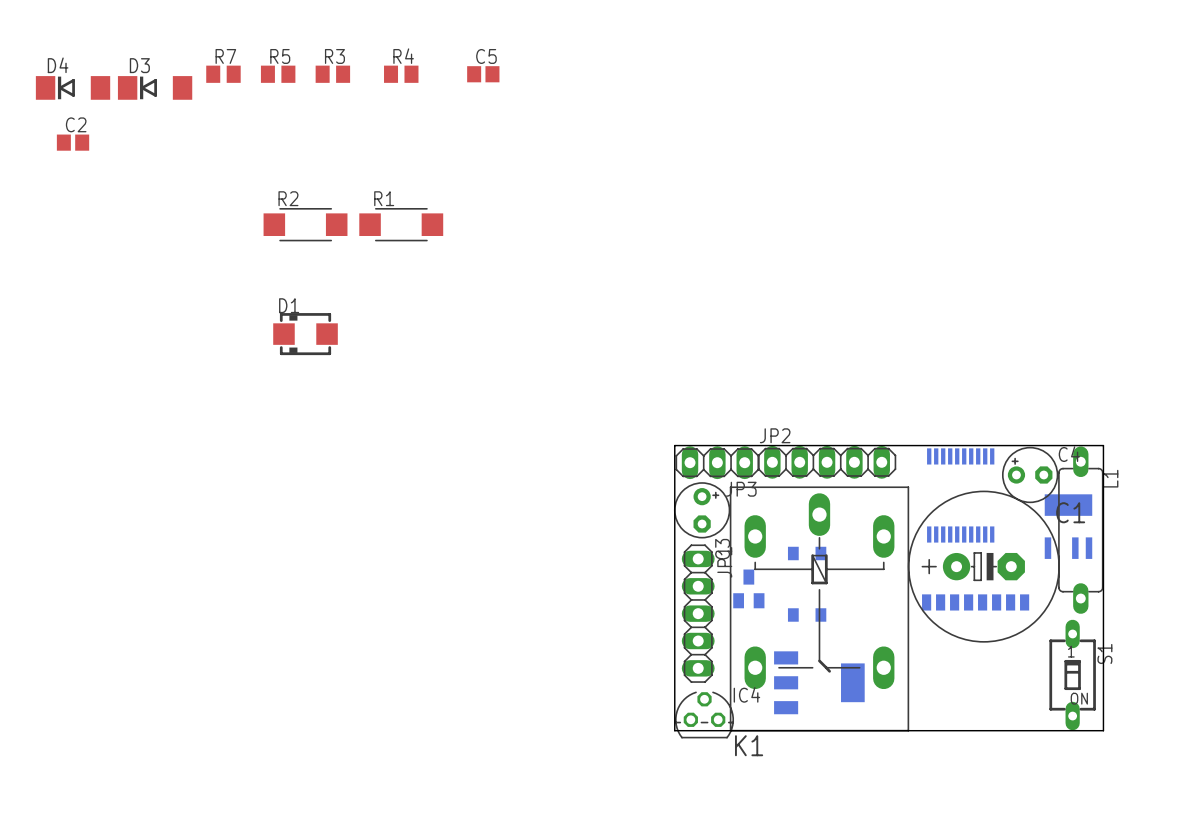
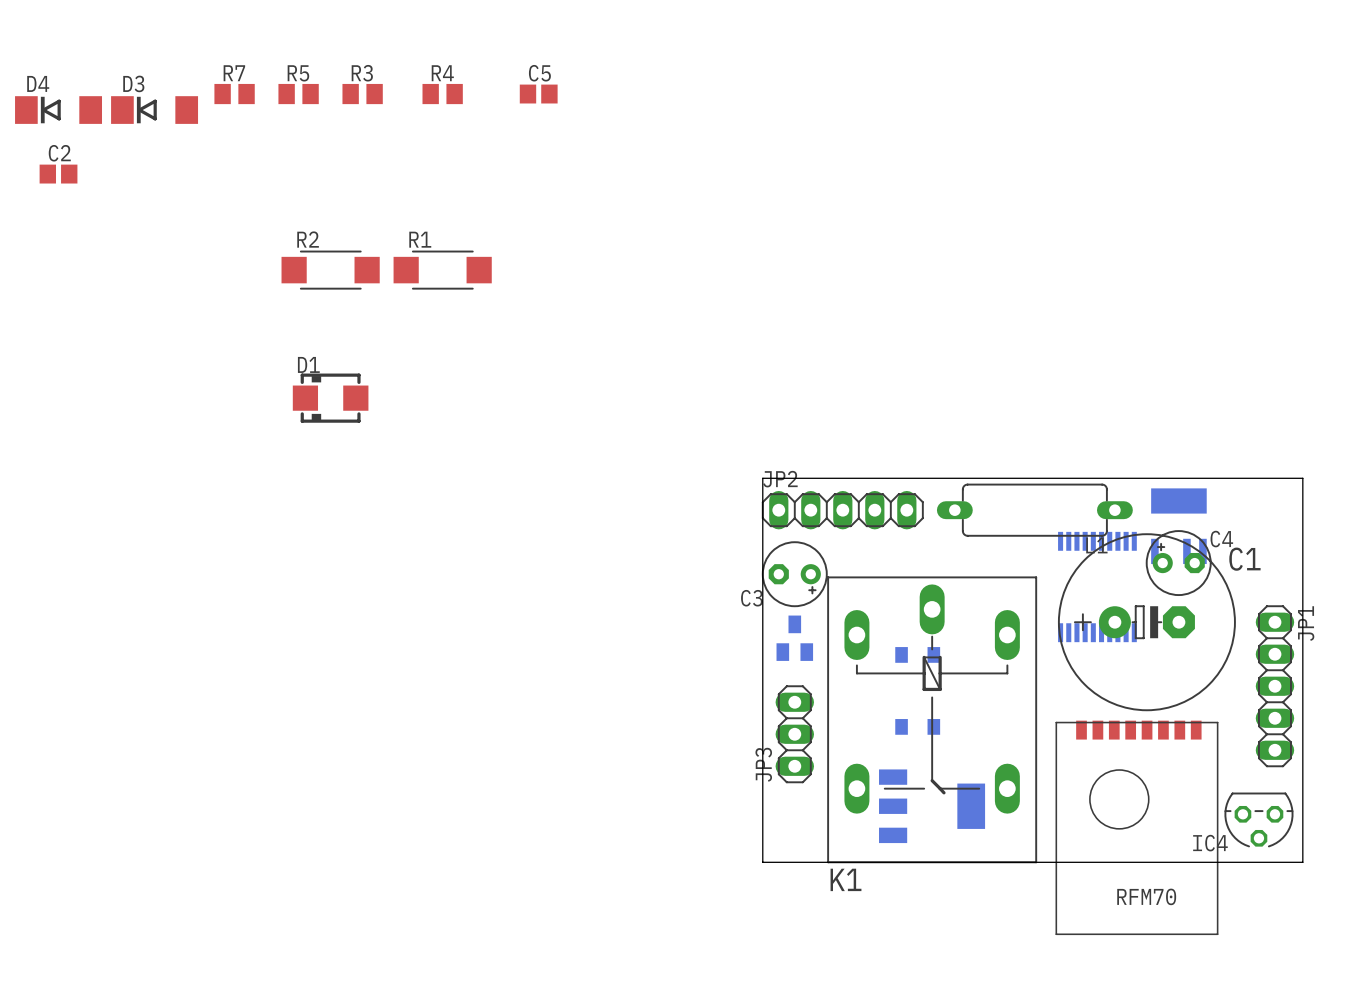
board edge: (674, 445) (1103, 445) (1103, 730) -> (762, 528) (762, 478) (1302, 478) (1302, 862) (1264, 862)
JP3 rotation: 0° (717, 462) -> 90° clockwise (794, 734)
JP3 position: (717, 462) -> (794, 734)
JP2 position: (827, 462) -> (842, 510)
C3 rotation: 0° (702, 510) -> 90° clockwise (794, 574)
part position: (1068, 526) -> (1178, 526)
L1 rotation: 0° (1080, 530) -> 90° clockwise (1034, 510)
L1 position: (1080, 530) -> (1034, 510)
C1 position: (983, 566) -> (1146, 622)
part position: (748, 588) -> (794, 638)
part side: bottom (975, 602) -> top (1136, 827)
JP1 position: (698, 613) -> (1274, 686)
S1: (1072, 675) -> none
IC4 rotation: 0° (704, 714) -> 180° (1258, 819)
IC4 position: (704, 714) -> (1258, 819)

